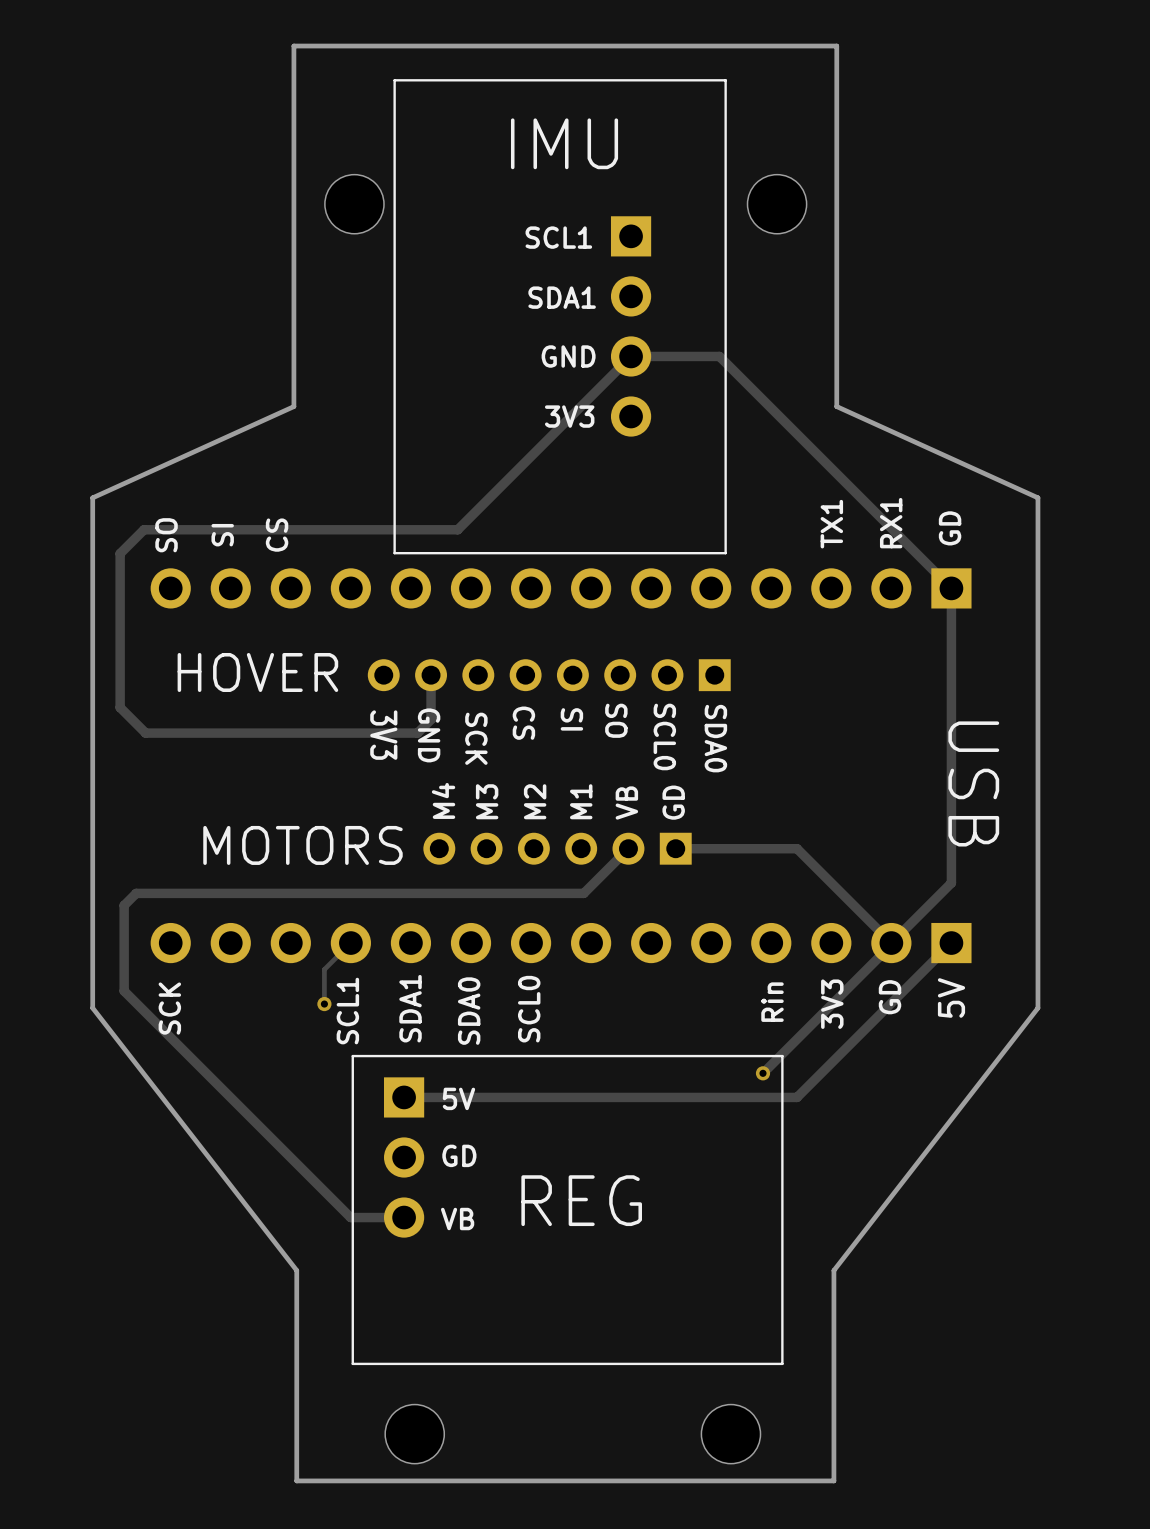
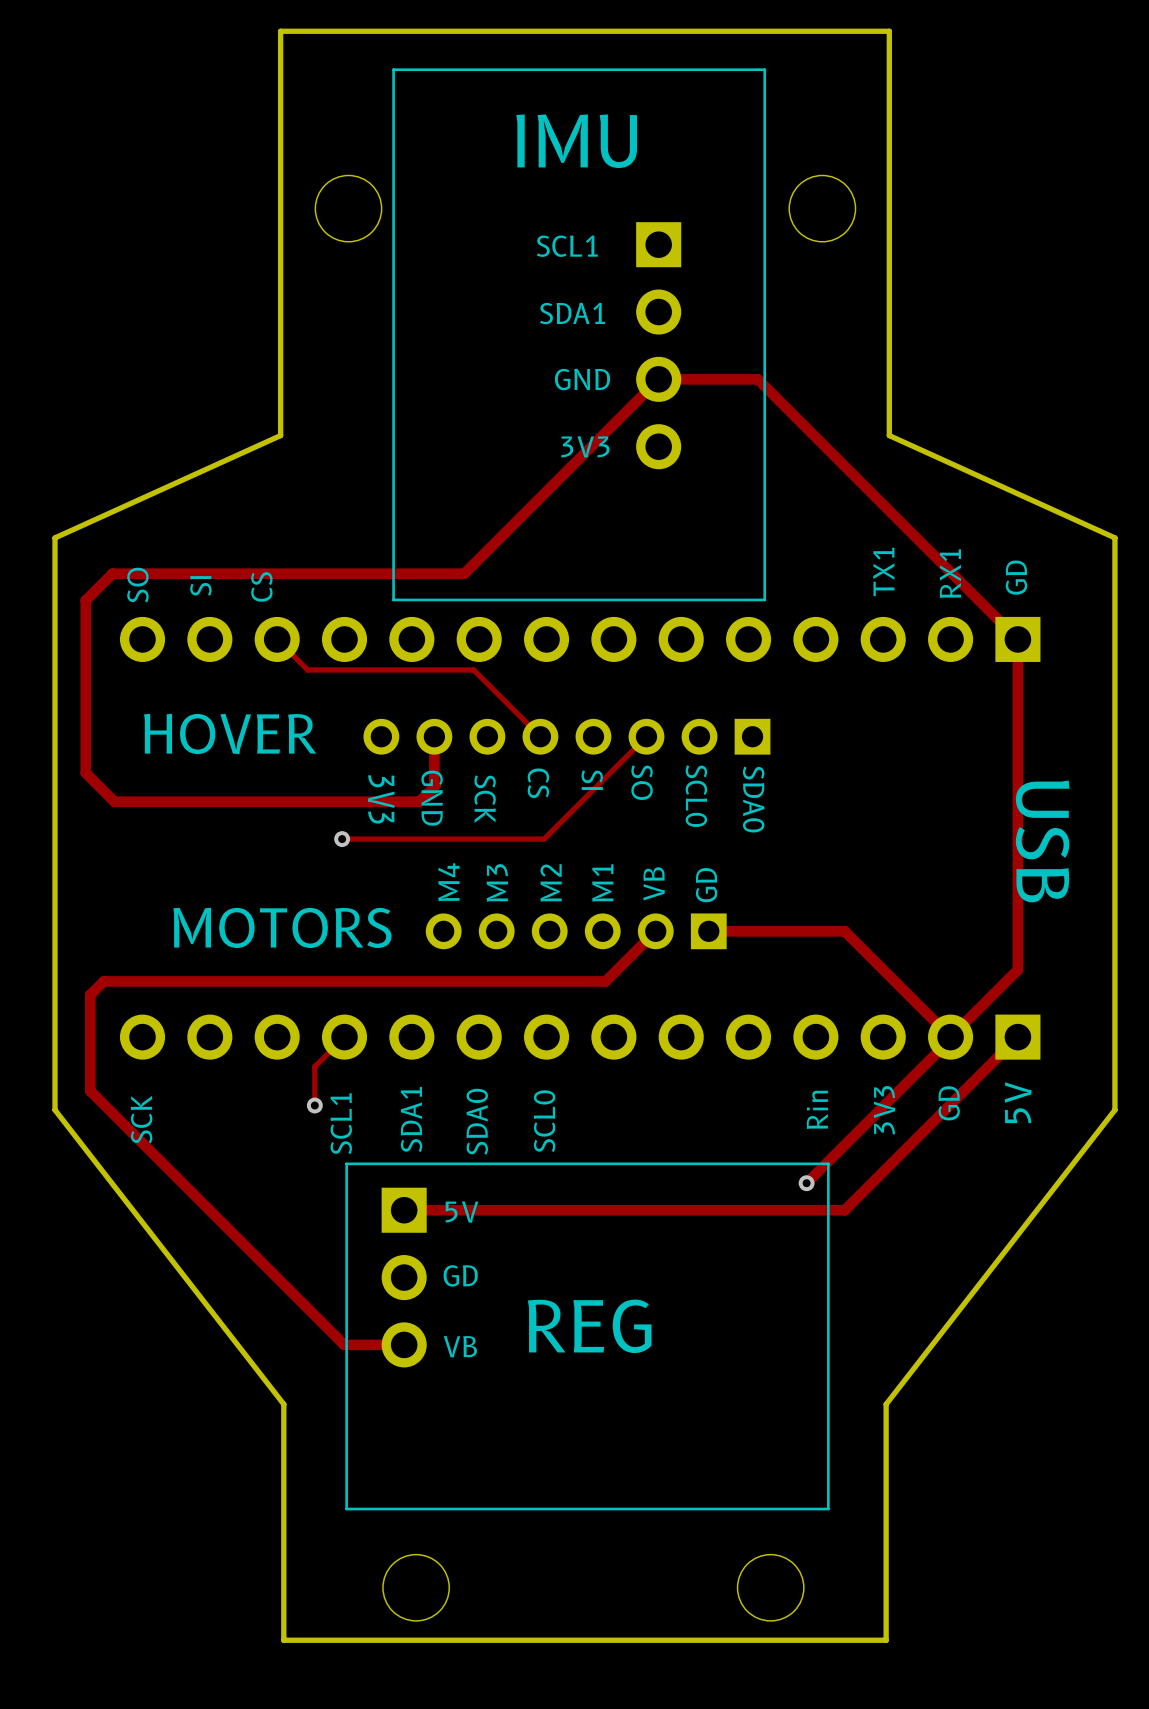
track: none -> (277, 639) (307, 669) (473, 669) (540, 736)
track: none -> (646, 736) (544, 839) (342, 839)
via: none -> (342, 839)

